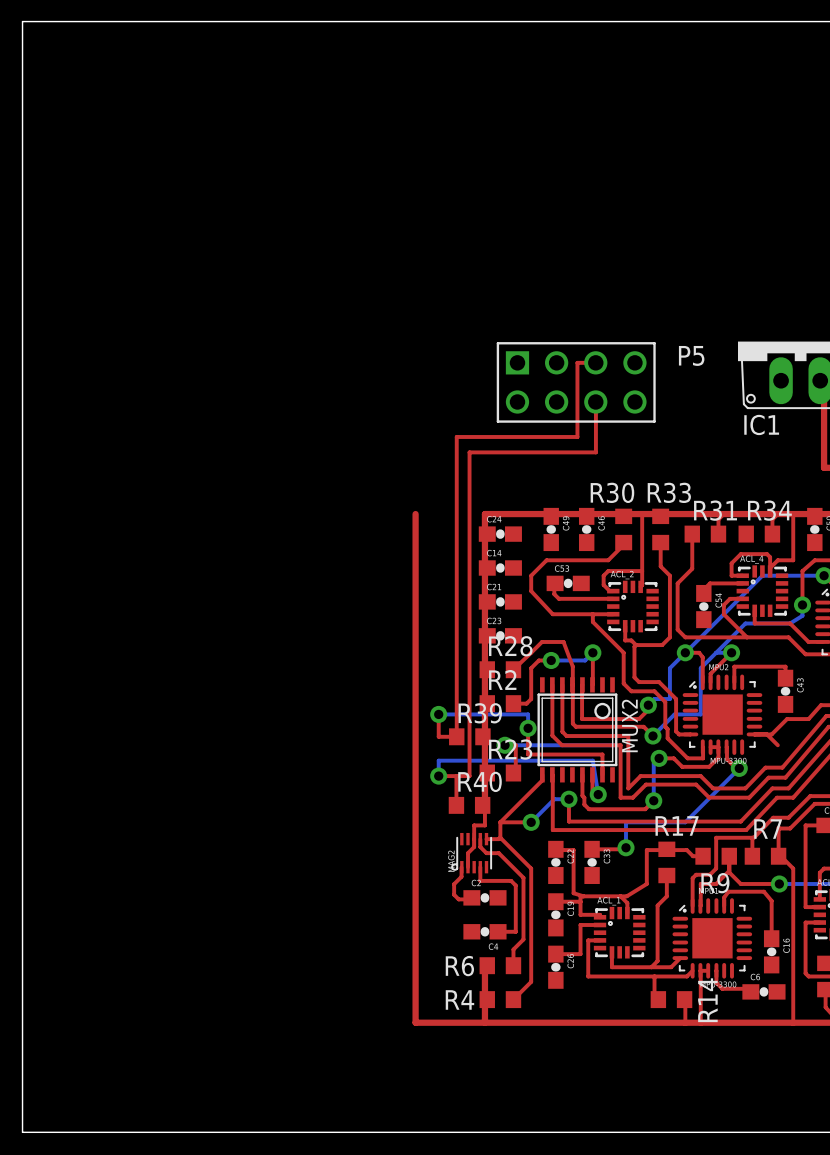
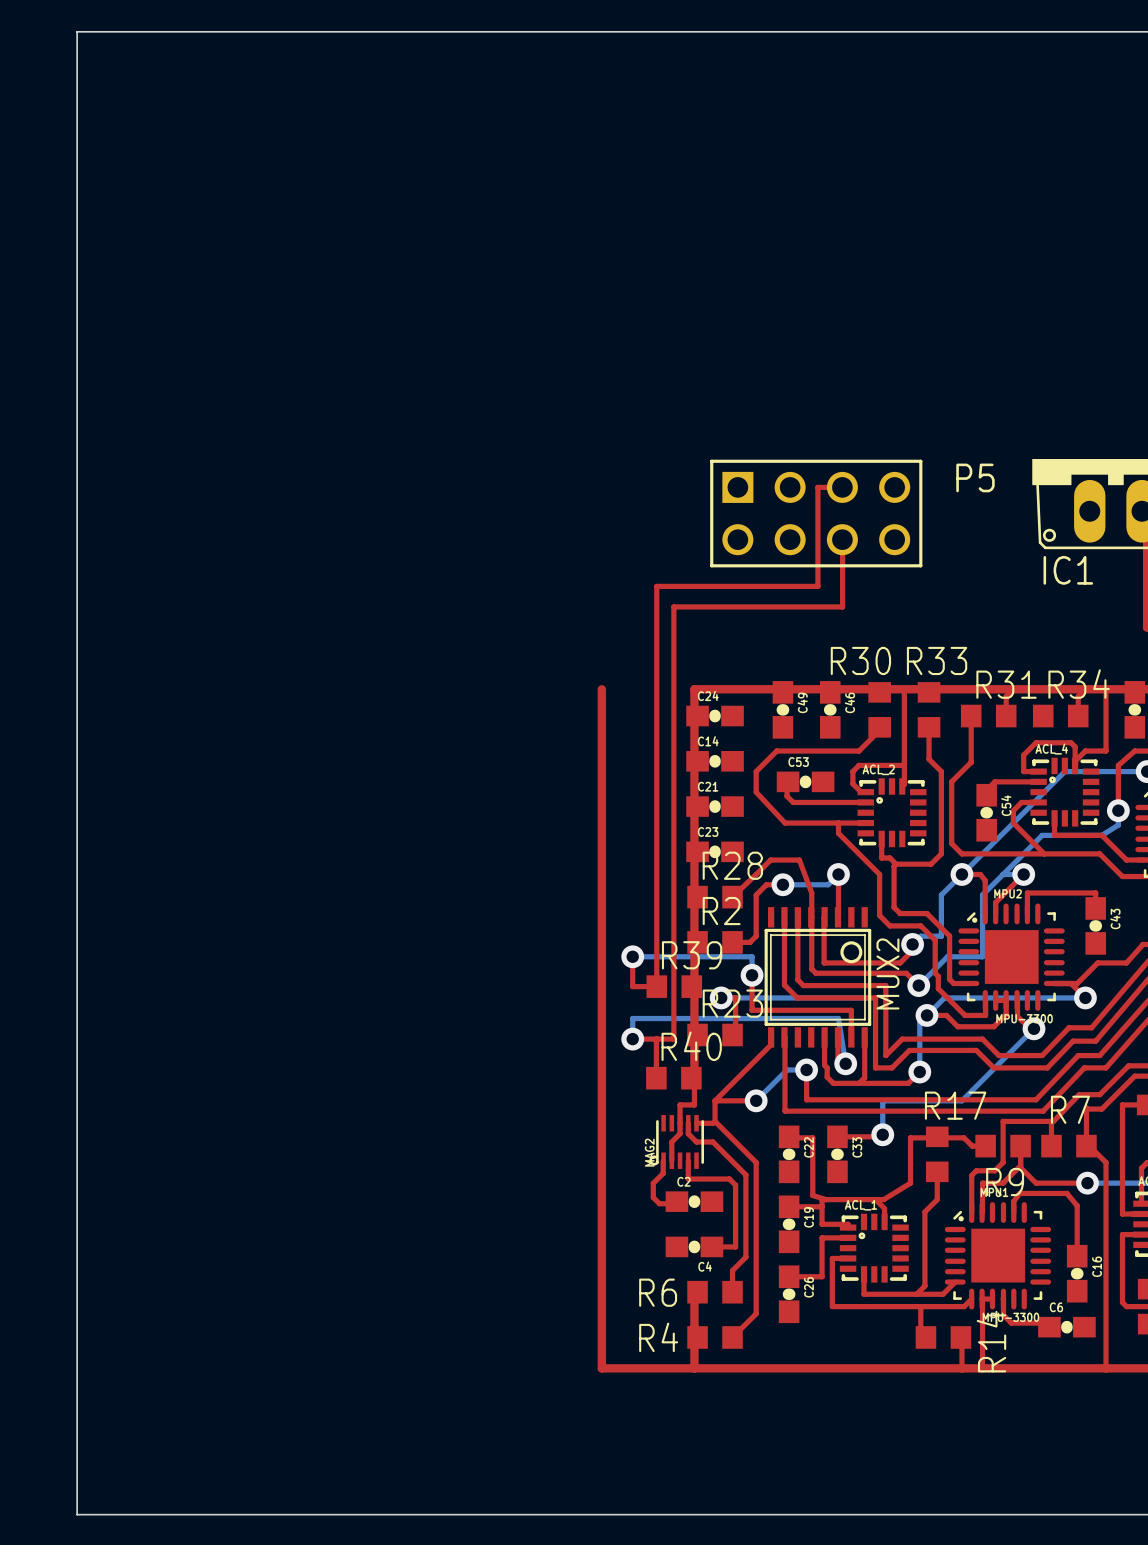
bottom track: none -> (1085, 997) (944, 997) (926, 1015)
via: none -> (1085, 997)
top track: none -> (864, 1037) (864, 1077) (859, 1083)

